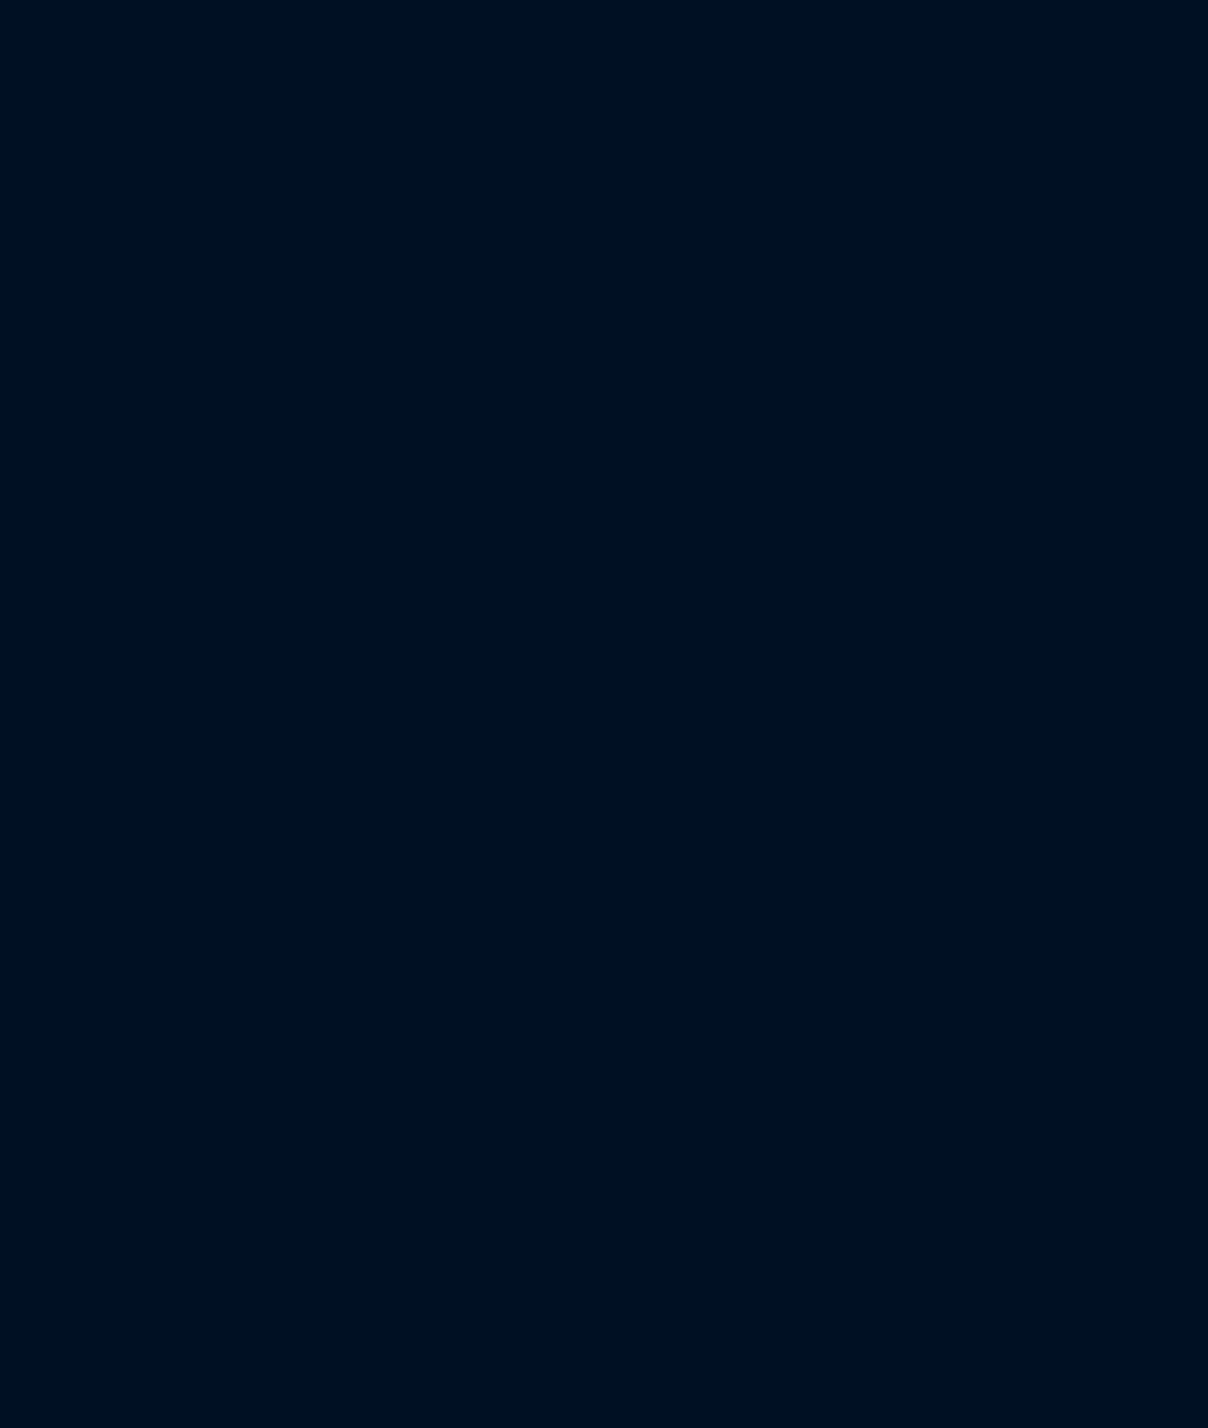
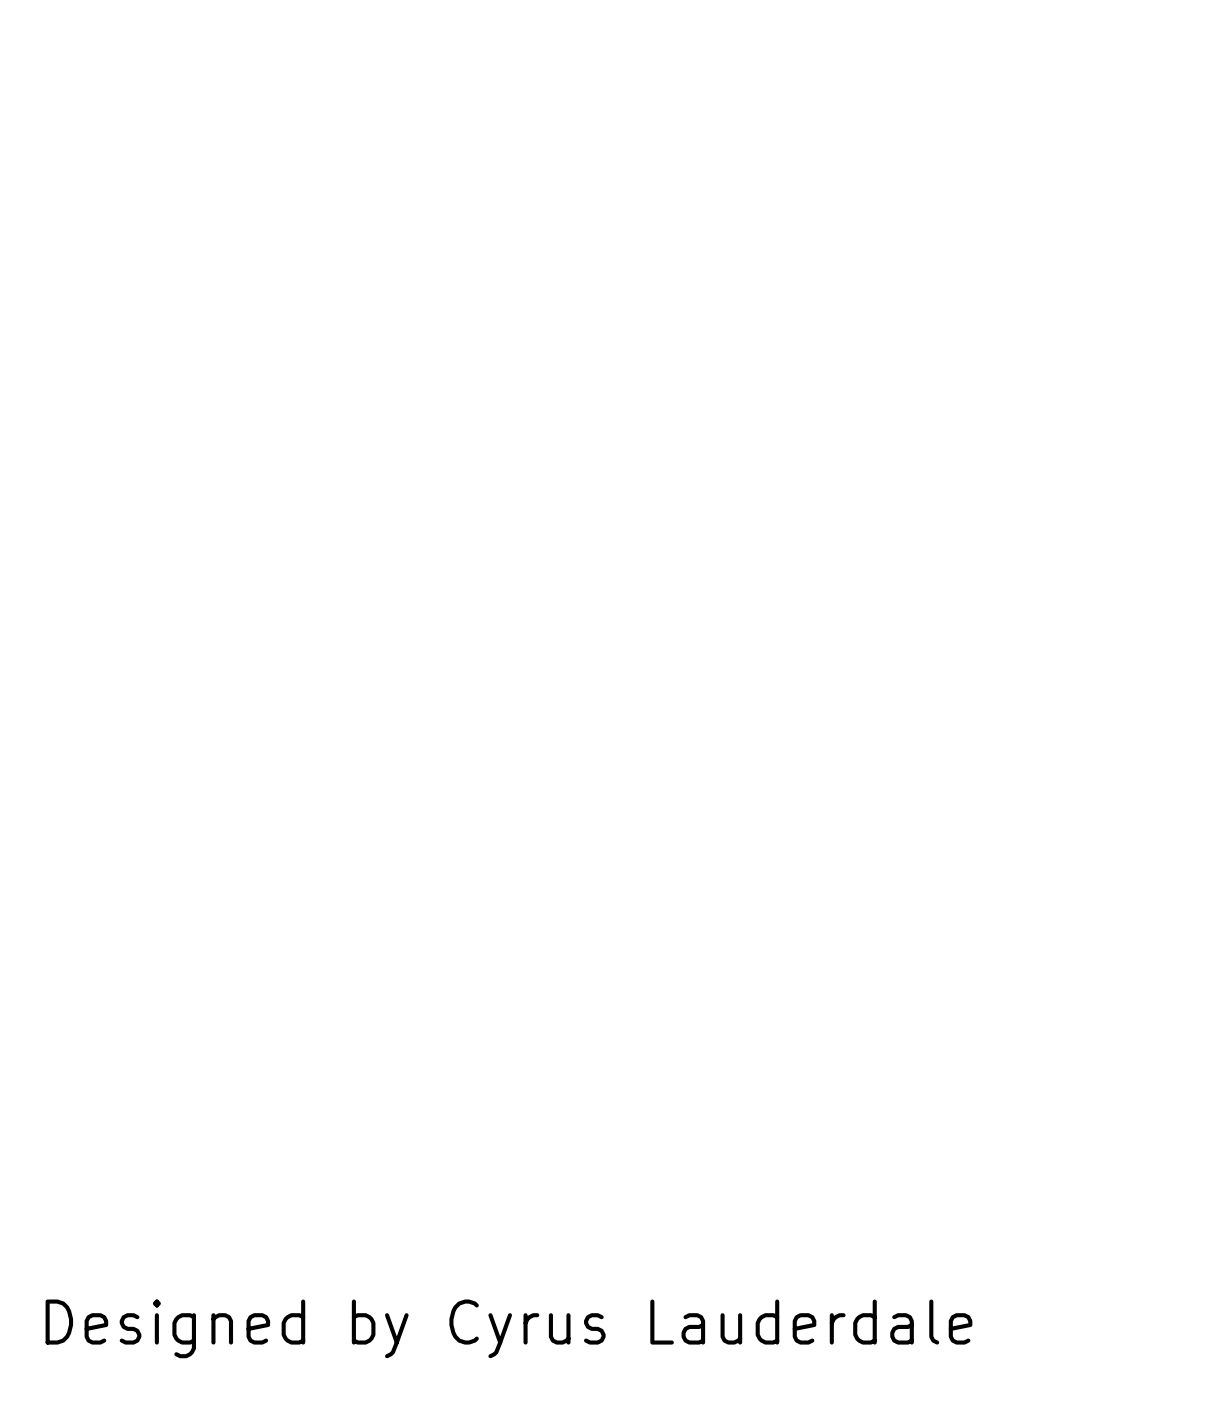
text: none -> Designed by Cyrus Lauderdale (508, 1328)

